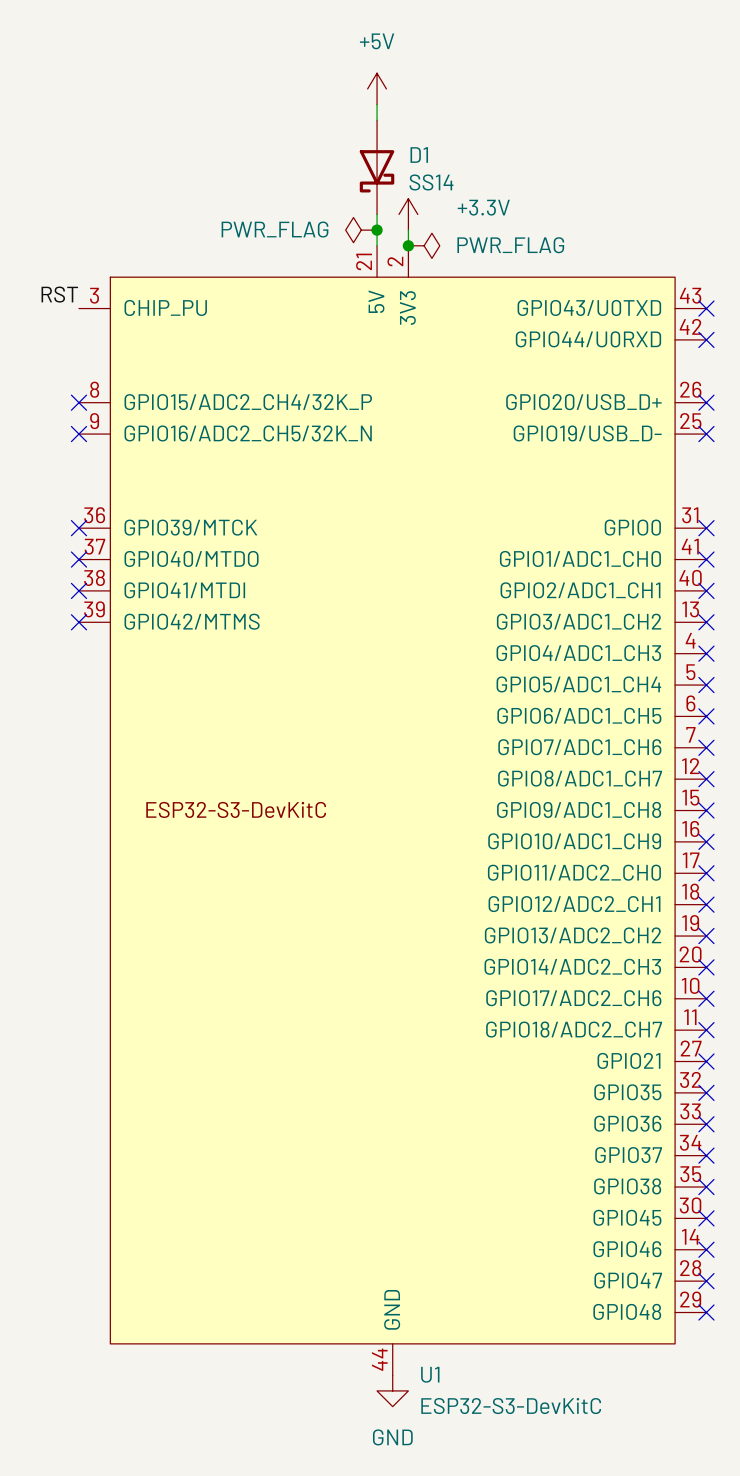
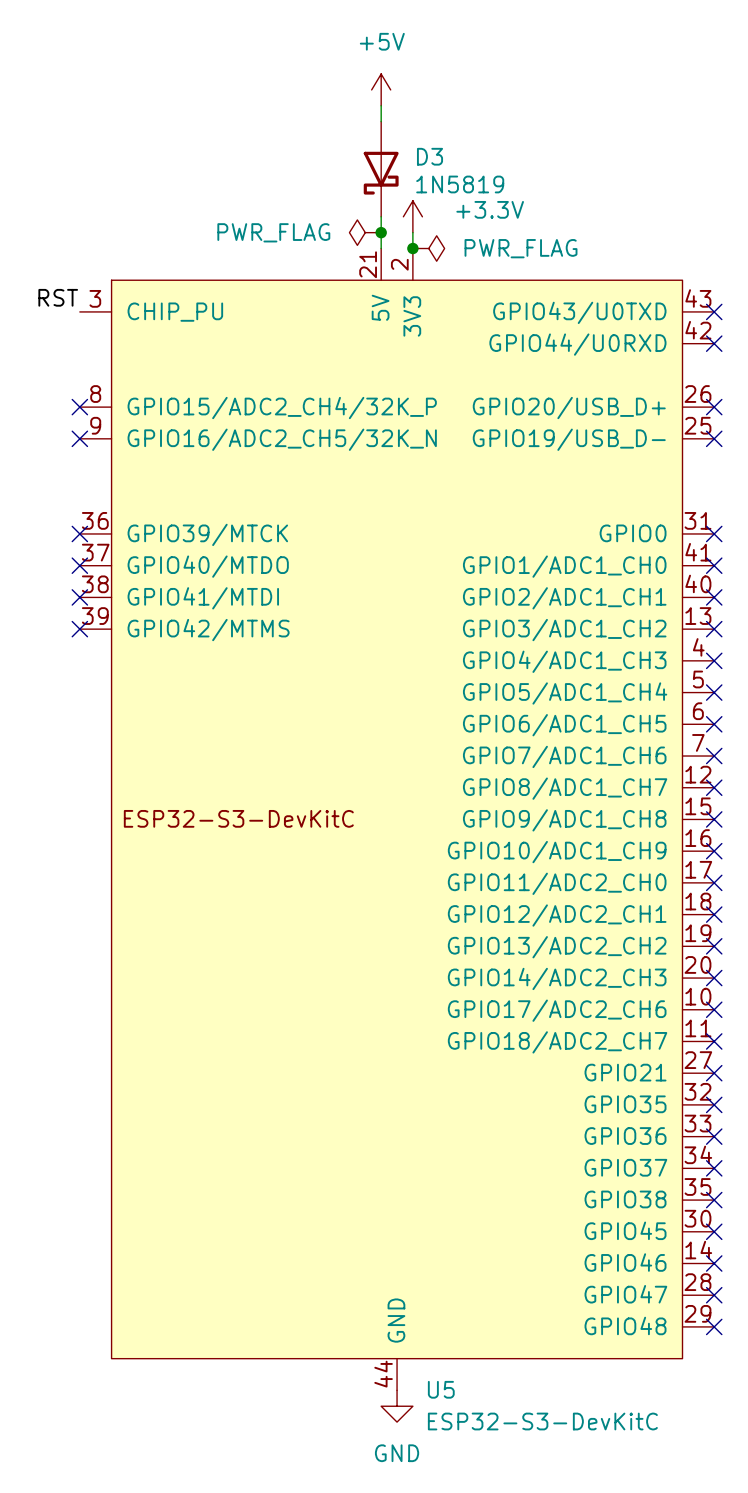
D1 name: D1 (419, 155) -> D3 (430, 156)
D1 value: SS14 (431, 182) -> 1N5819 (460, 184)
U1 name: U1 (430, 1374) -> U5 (441, 1389)

